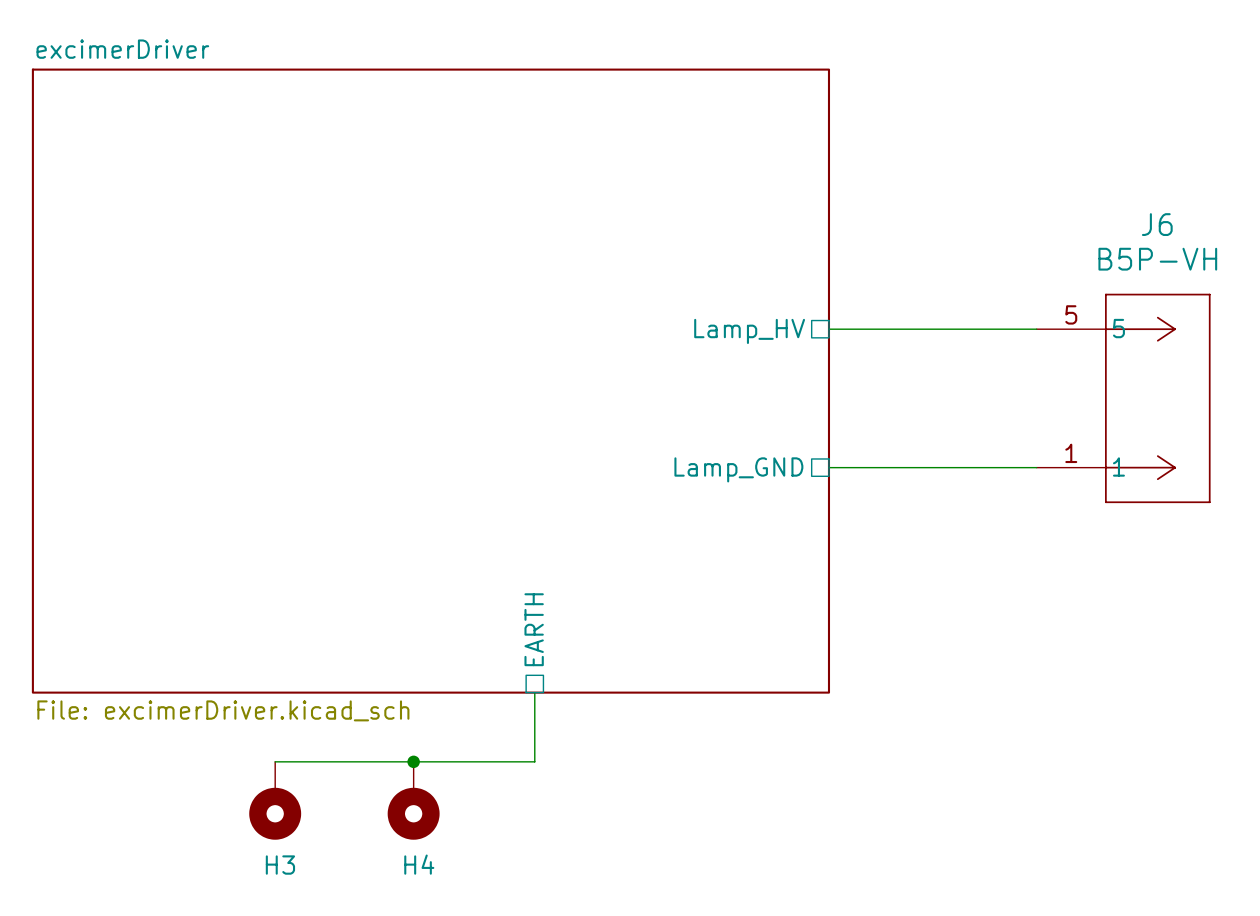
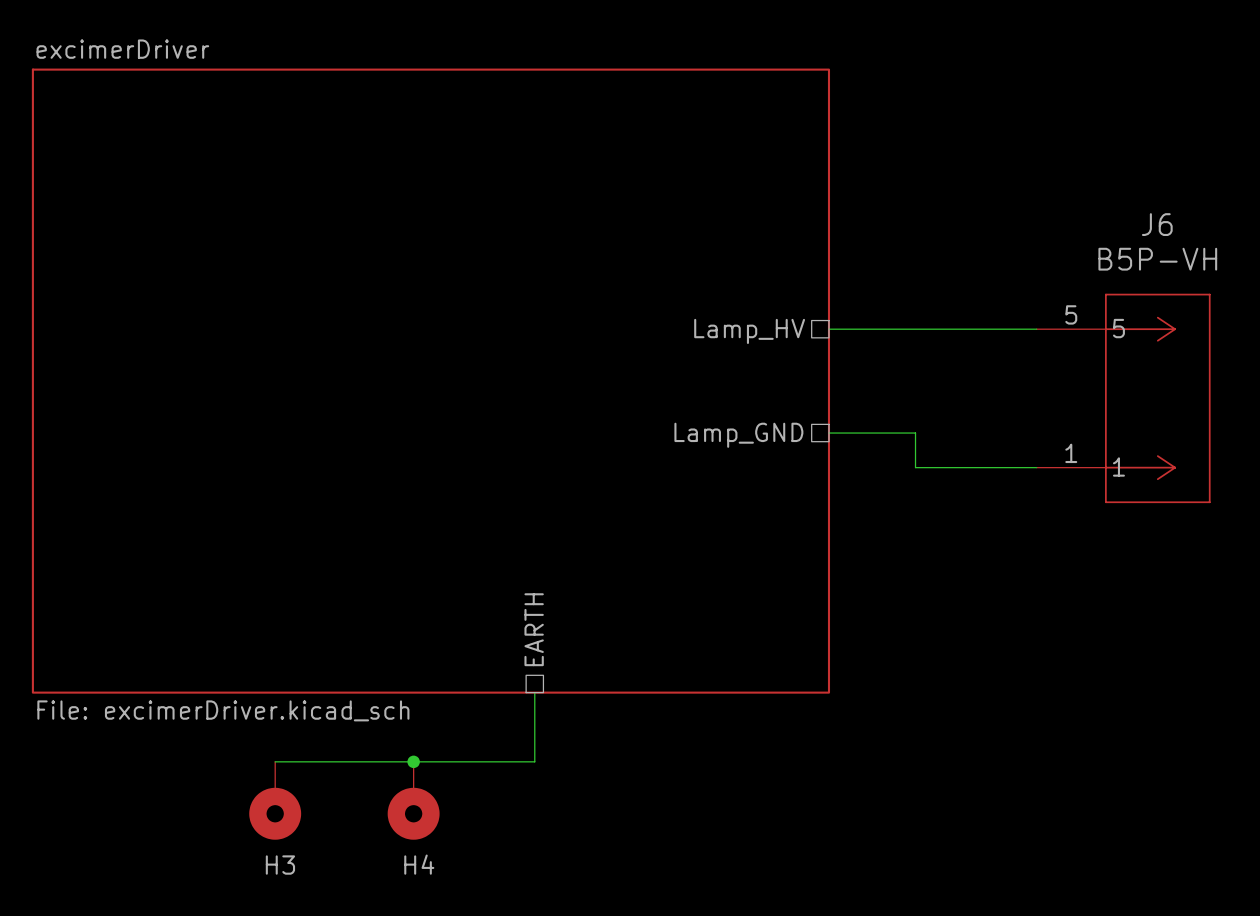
wire: (828, 467) (915, 467) -> (828, 433) (915, 433) (915, 467)
sheet pin position: Lamp_GND (738, 469) -> Lamp_GND (738, 435)

